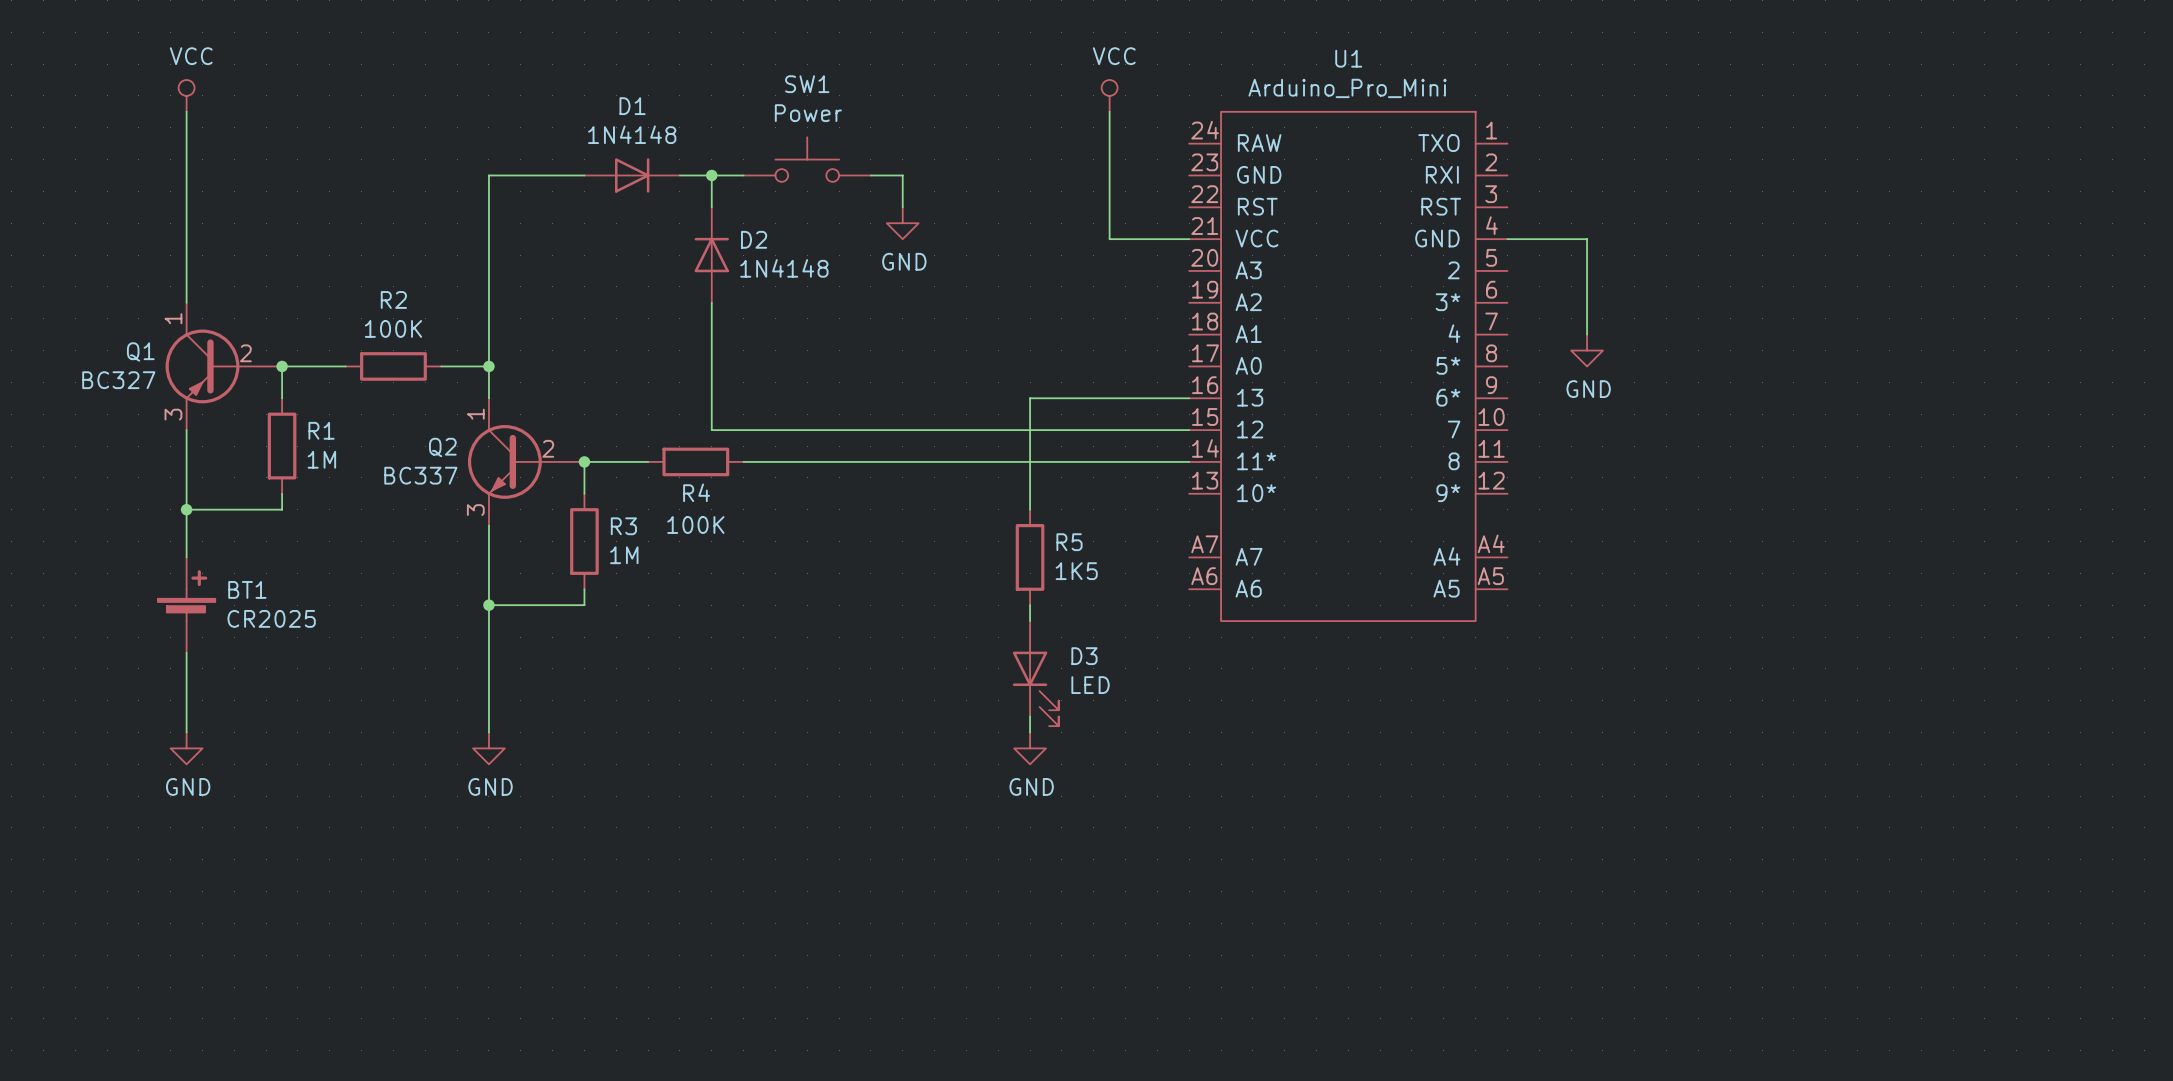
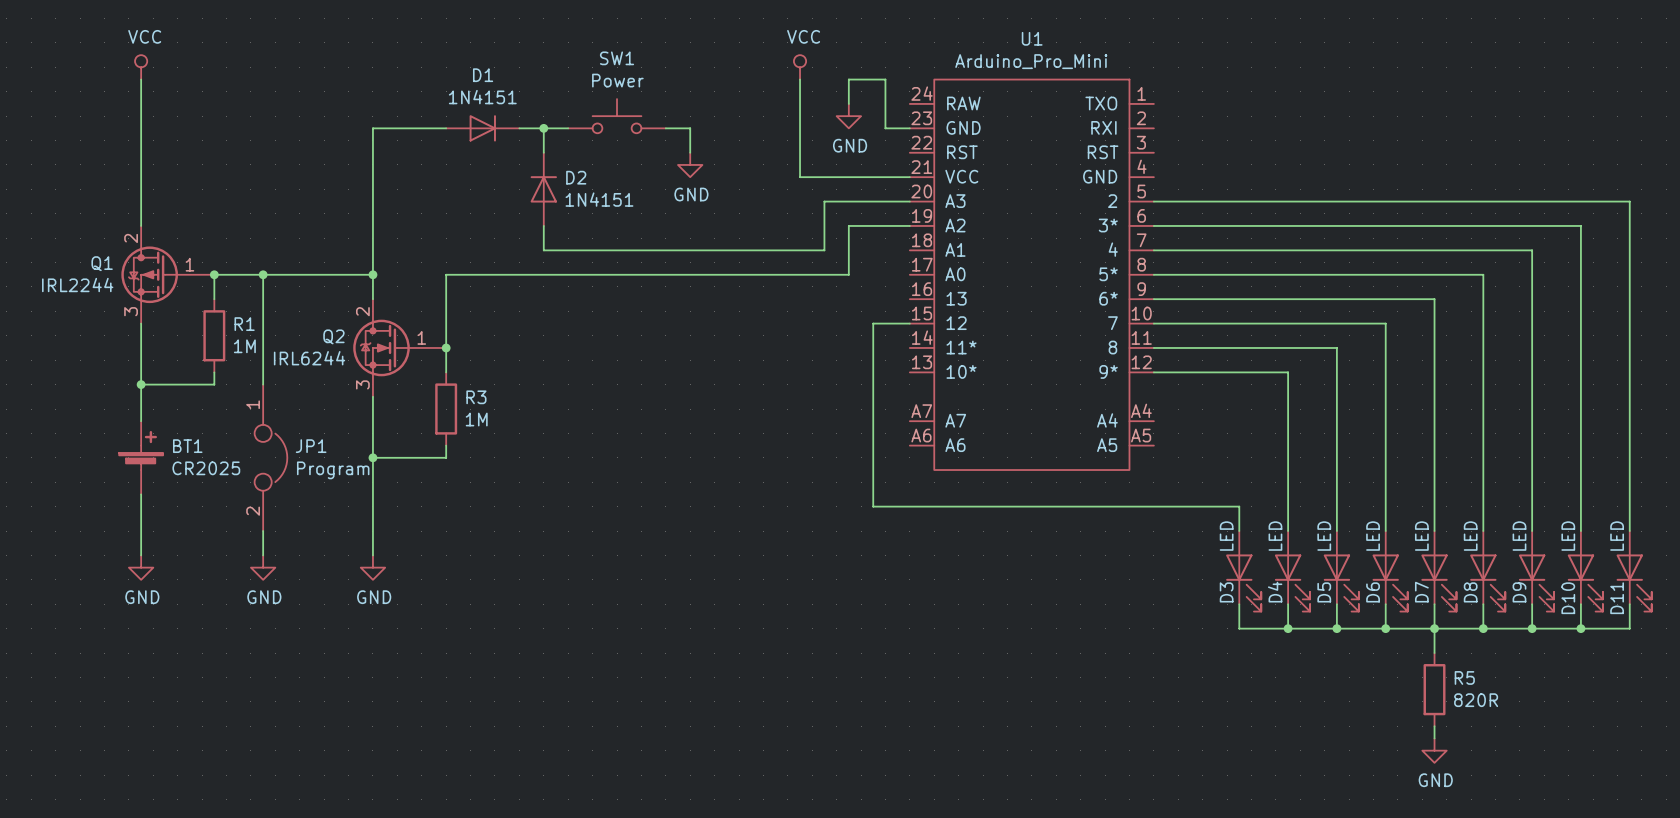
power symbol position: VCC (1109, 95) -> VCC (800, 67)
wire: none -> (848, 79) (885, 79) (885, 128) (909, 128)
D1 value: 1N4148 (632, 134) -> 1N4151 (482, 97)
wire: (1109, 143) (1109, 239) -> (800, 79) (800, 177) (848, 177)
power symbol: none -> GND (848, 116)
wire: (1507, 239) (1587, 239) (1587, 334) -> none
D2 value: 1N4148 (784, 268) -> 1N4151 (599, 199)
wire: none -> (1153, 201) (1629, 201) (1629, 531)
Q1 symbol: [165, 302, 283, 431] -> [121, 225, 215, 324]
wire: none -> (1153, 225) (1580, 225) (1580, 531)
wire: (711, 334) (711, 430) (1141, 430) -> (543, 250) (824, 250) (824, 201) (909, 201)
wire: none -> (1153, 250) (1532, 250) (1532, 531)
power symbol: GND (1587, 350) -> none
junction: none -> (263, 274)
R2: 100K (393, 366) -> none
wire: none -> (336, 274) (263, 274) (263, 384)
wire: none -> (1153, 274) (1483, 274) (1483, 531)
Q1 value: BC327 (118, 380) -> IRL2244 (77, 285)
Q2 symbol: [467, 398, 585, 526] -> [353, 299, 447, 397]
wire: (1189, 398) (1030, 398) (1030, 509) -> none
wire: none -> (1153, 299) (1434, 299) (1434, 531)
wire: none -> (873, 323) (873, 506) (1239, 506) (1239, 531)
wire: none -> (1153, 323) (1385, 323) (1385, 531)
wire: (584, 461) (648, 461) -> (446, 347) (446, 274) (848, 274) (848, 225) (909, 225)
R4: 100K (695, 461) -> none
wire: (743, 461) (1189, 461) -> none
wire: none -> (1153, 347) (1336, 347) (1336, 531)
Q2 value: BC337 (420, 475) -> IRL6244 (309, 358)
wire: none -> (1153, 372) (1288, 372) (1288, 531)
R5 position: (1030, 557) -> (1434, 689)
R5 value: 1K5 (1076, 571) -> 820R (1476, 700)
JP1: none -> Program (270, 457)
wire: (1030, 605) (1030, 621) -> none
D3 name rotation: 0° (1084, 656) -> 90° counterclockwise (1226, 592)
D3 name position: D3 (1084, 656) -> D3 (1226, 592)
D3 position: (1035, 673) -> (1243, 571)
D3 value rotation: 0° (1090, 685) -> 90° counterclockwise (1226, 536)
D3 value position: LED (1090, 685) -> LED (1226, 536)
wire: none -> (263, 531) (263, 555)
wire: (1030, 716) (1030, 732) -> none
power symbol: none -> GND (263, 567)
power symbol: GND (1030, 748) -> none
D4: none -> LED (1292, 571)
D5: none -> LED (1341, 571)
D6: none -> LED (1390, 571)
D7: none -> LED (1438, 571)
D8: none -> LED (1487, 571)
D9: none -> LED (1536, 571)
D10: none -> LED (1585, 571)
D11: none -> LED (1634, 571)
wire: none -> (1239, 604) (1239, 628) (1629, 628) (1629, 604)
wire: none -> (1288, 604) (1288, 628)
wire: none -> (1336, 604) (1336, 628)
wire: none -> (1385, 604) (1385, 628)
wire: none -> (1434, 604) (1434, 653)
wire: none -> (1483, 604) (1483, 628)
wire: none -> (1532, 604) (1532, 628)
wire: none -> (1580, 604) (1580, 628)
junction: none -> (1288, 628)
junction: none -> (1336, 628)
junction: none -> (1385, 628)
junction: none -> (1434, 628)
junction: none -> (1483, 628)
junction: none -> (1532, 628)
junction: none -> (1580, 628)
wire: none -> (1434, 726) (1434, 738)
power symbol: none -> GND (1434, 750)

